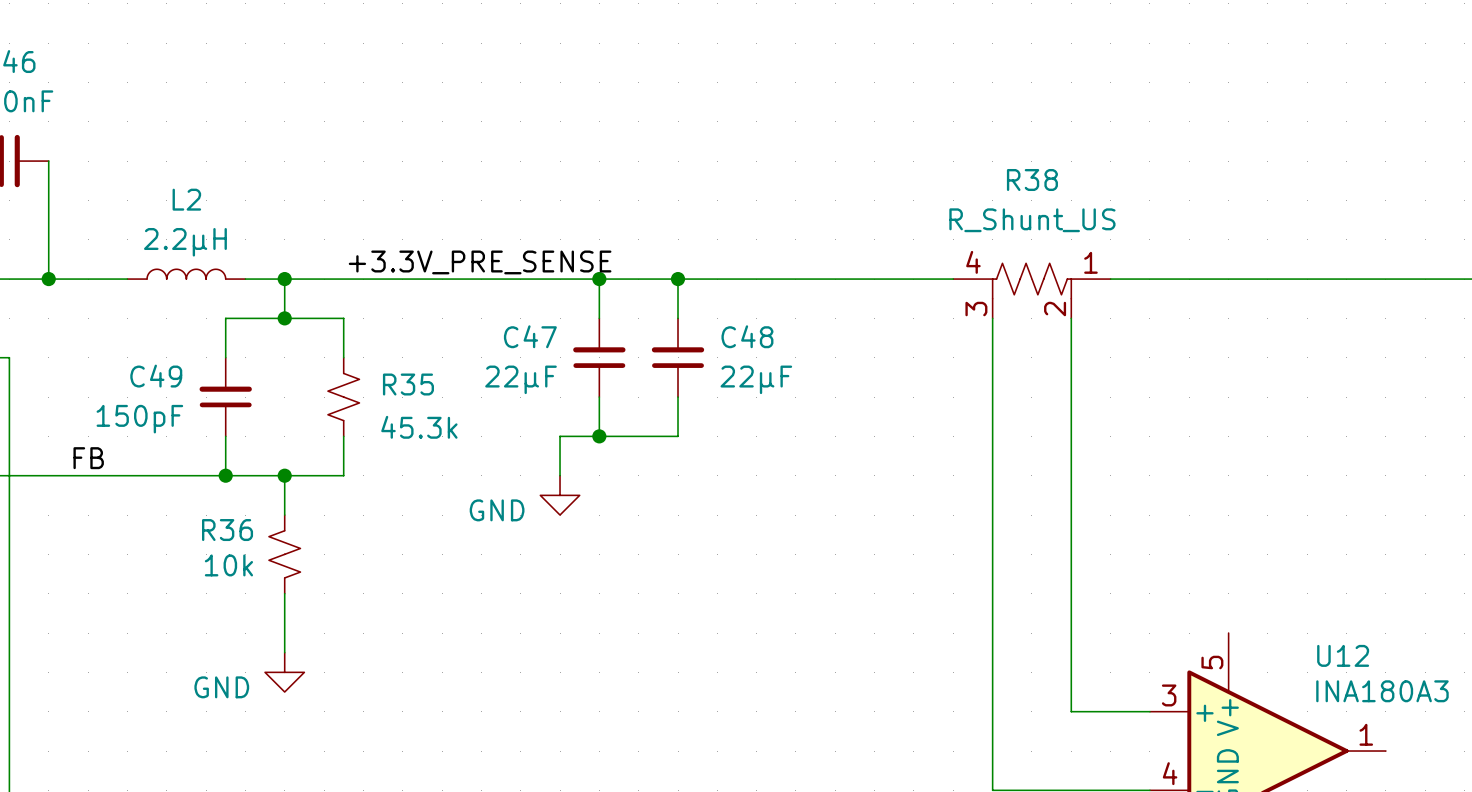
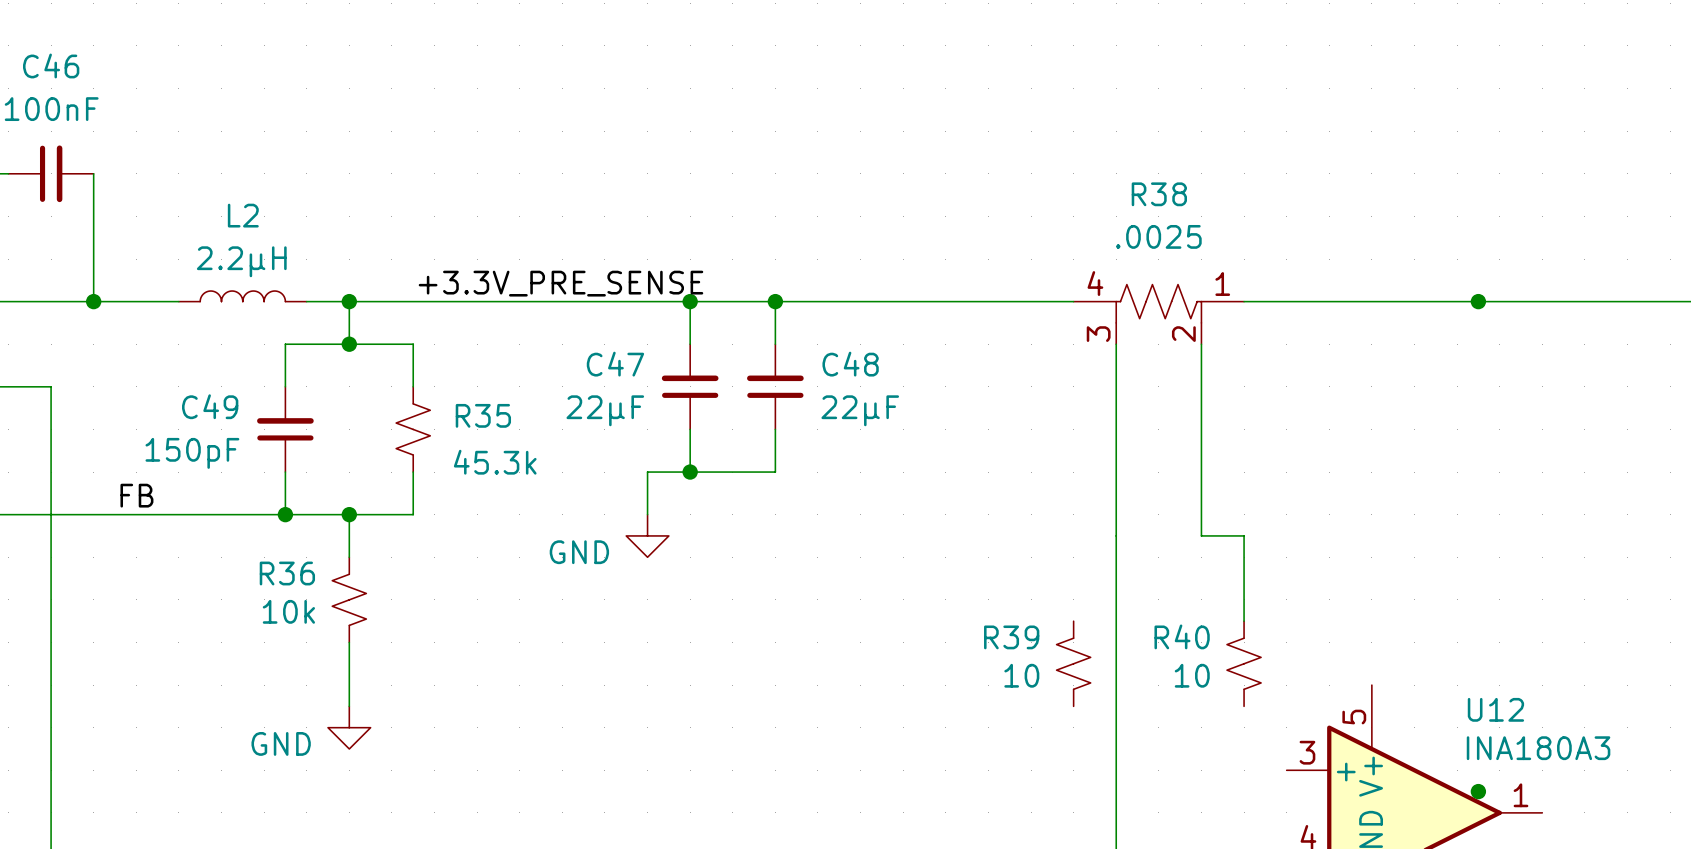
R38 value: R_Shunt_US (1032, 220) -> .0025 (1158, 236)
junction: none -> (1478, 301)
wire: (1071, 495) (1071, 711) (1149, 711) -> (1201, 535) (1244, 535) (1244, 621)
R39: none -> 10 (1073, 663)
R40: none -> 10 (1244, 663)
junction: none -> (1478, 791)

